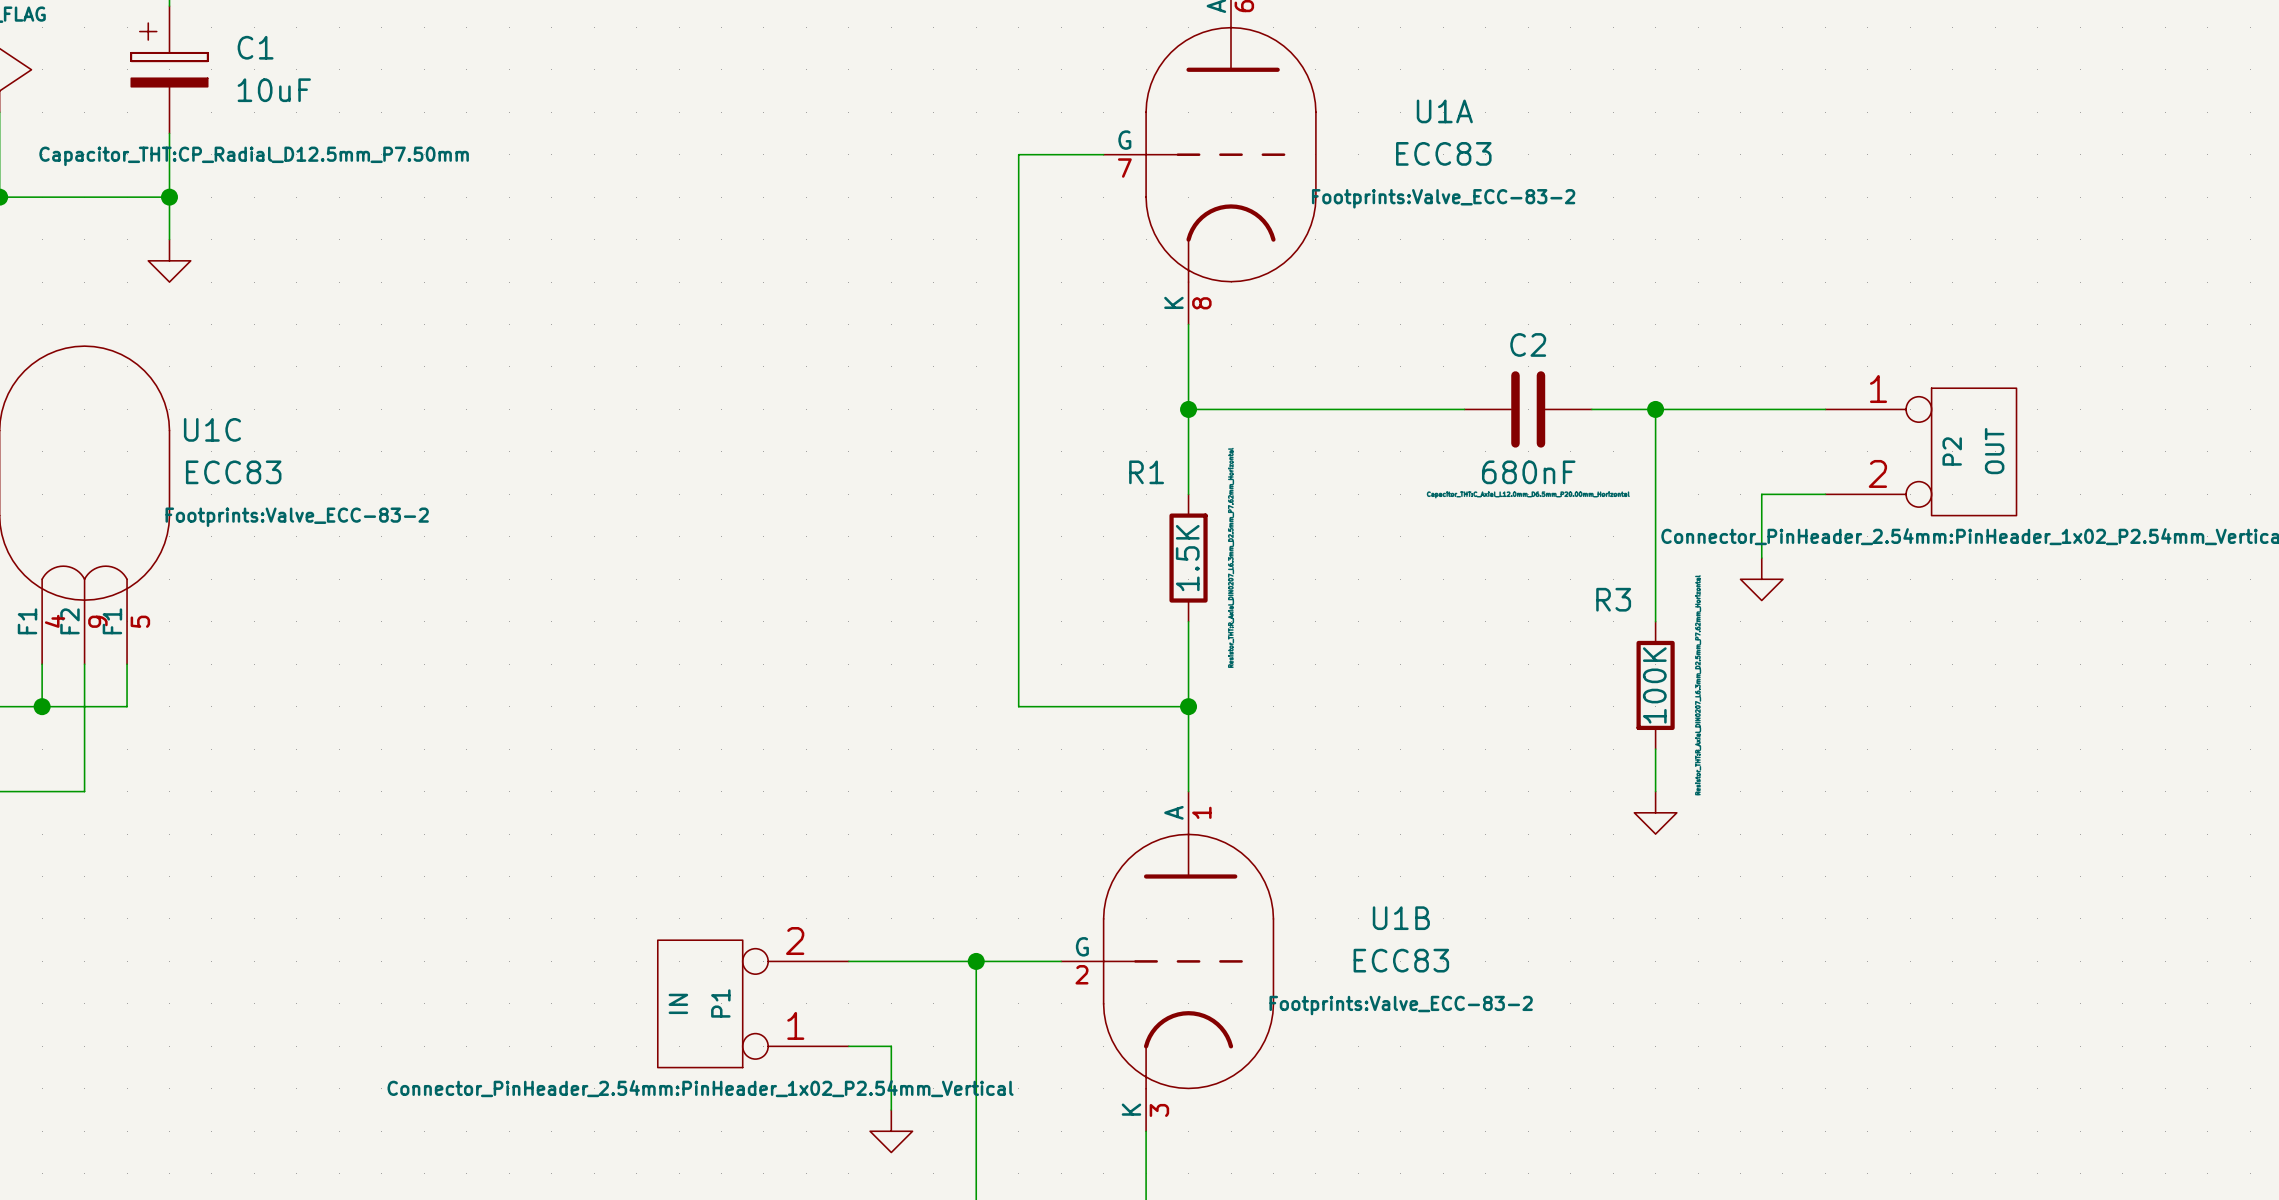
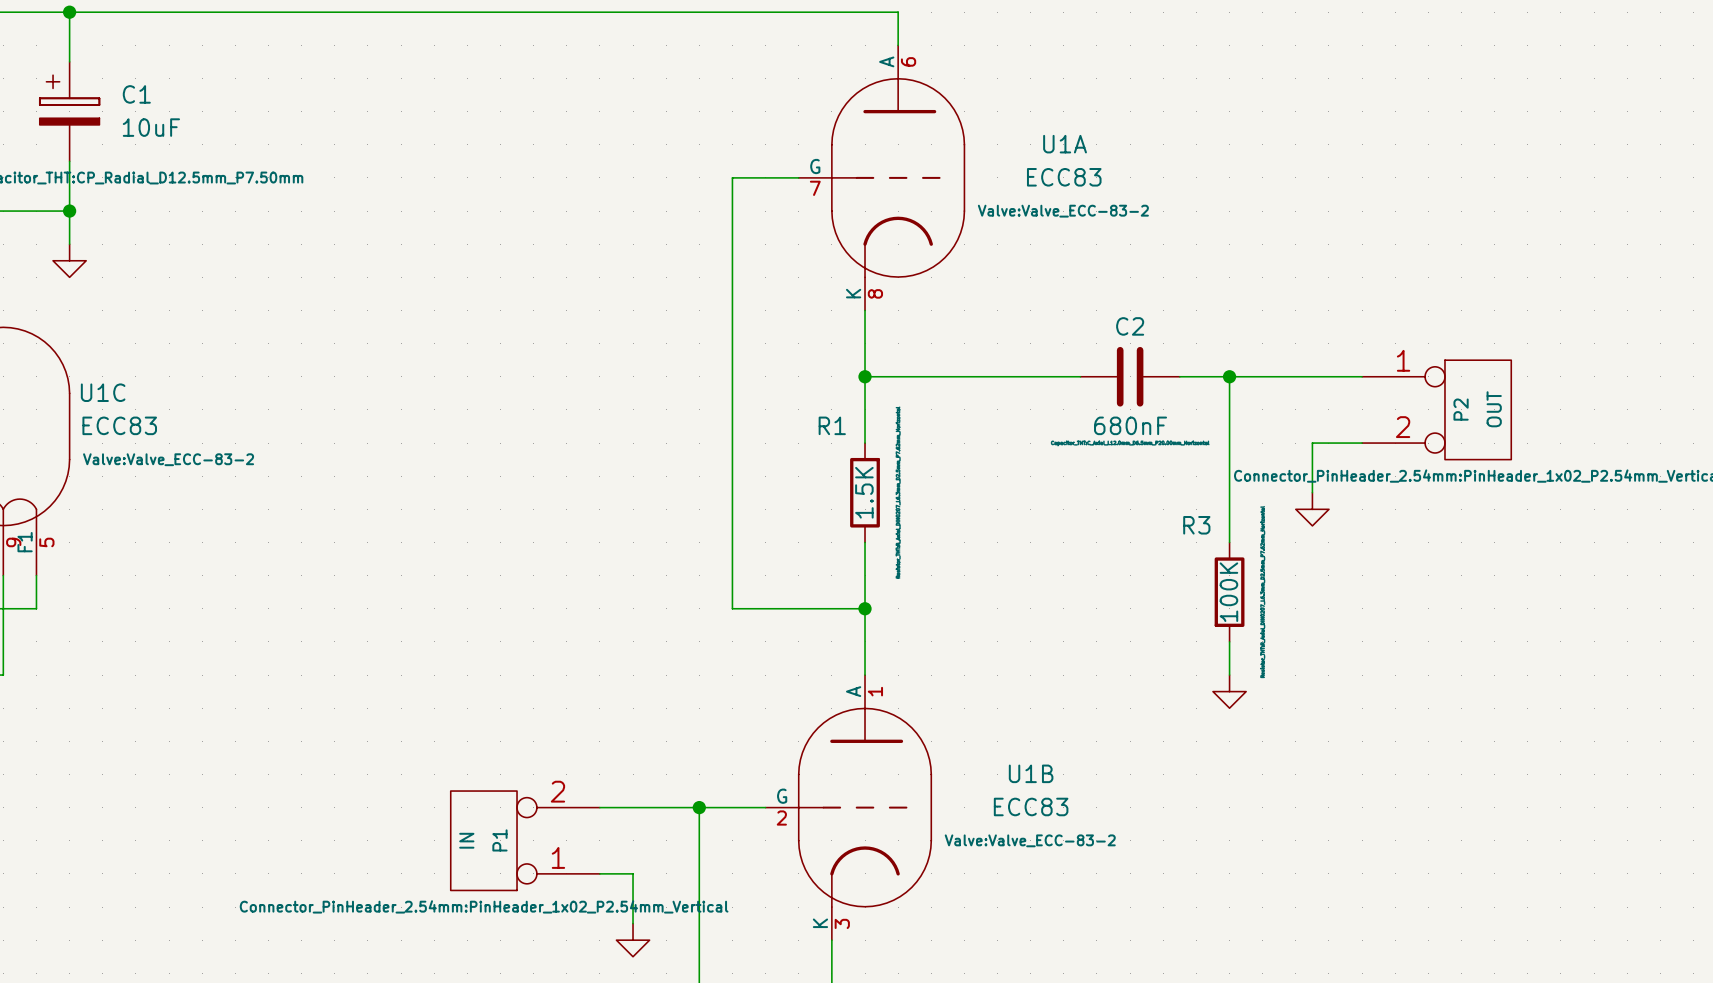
U1A text: Footprints:Valve_ECC-83-2 (1443, 198) -> Valve:Valve_ECC-83-2 (1063, 211)
U1C text: Footprints:Valve_ECC-83-2 (297, 517) -> Valve:Valve_ECC-83-2 (168, 459)
U1B text: Footprints:Valve_ECC-83-2 (1401, 1005) -> Valve:Valve_ECC-83-2 (1030, 840)

